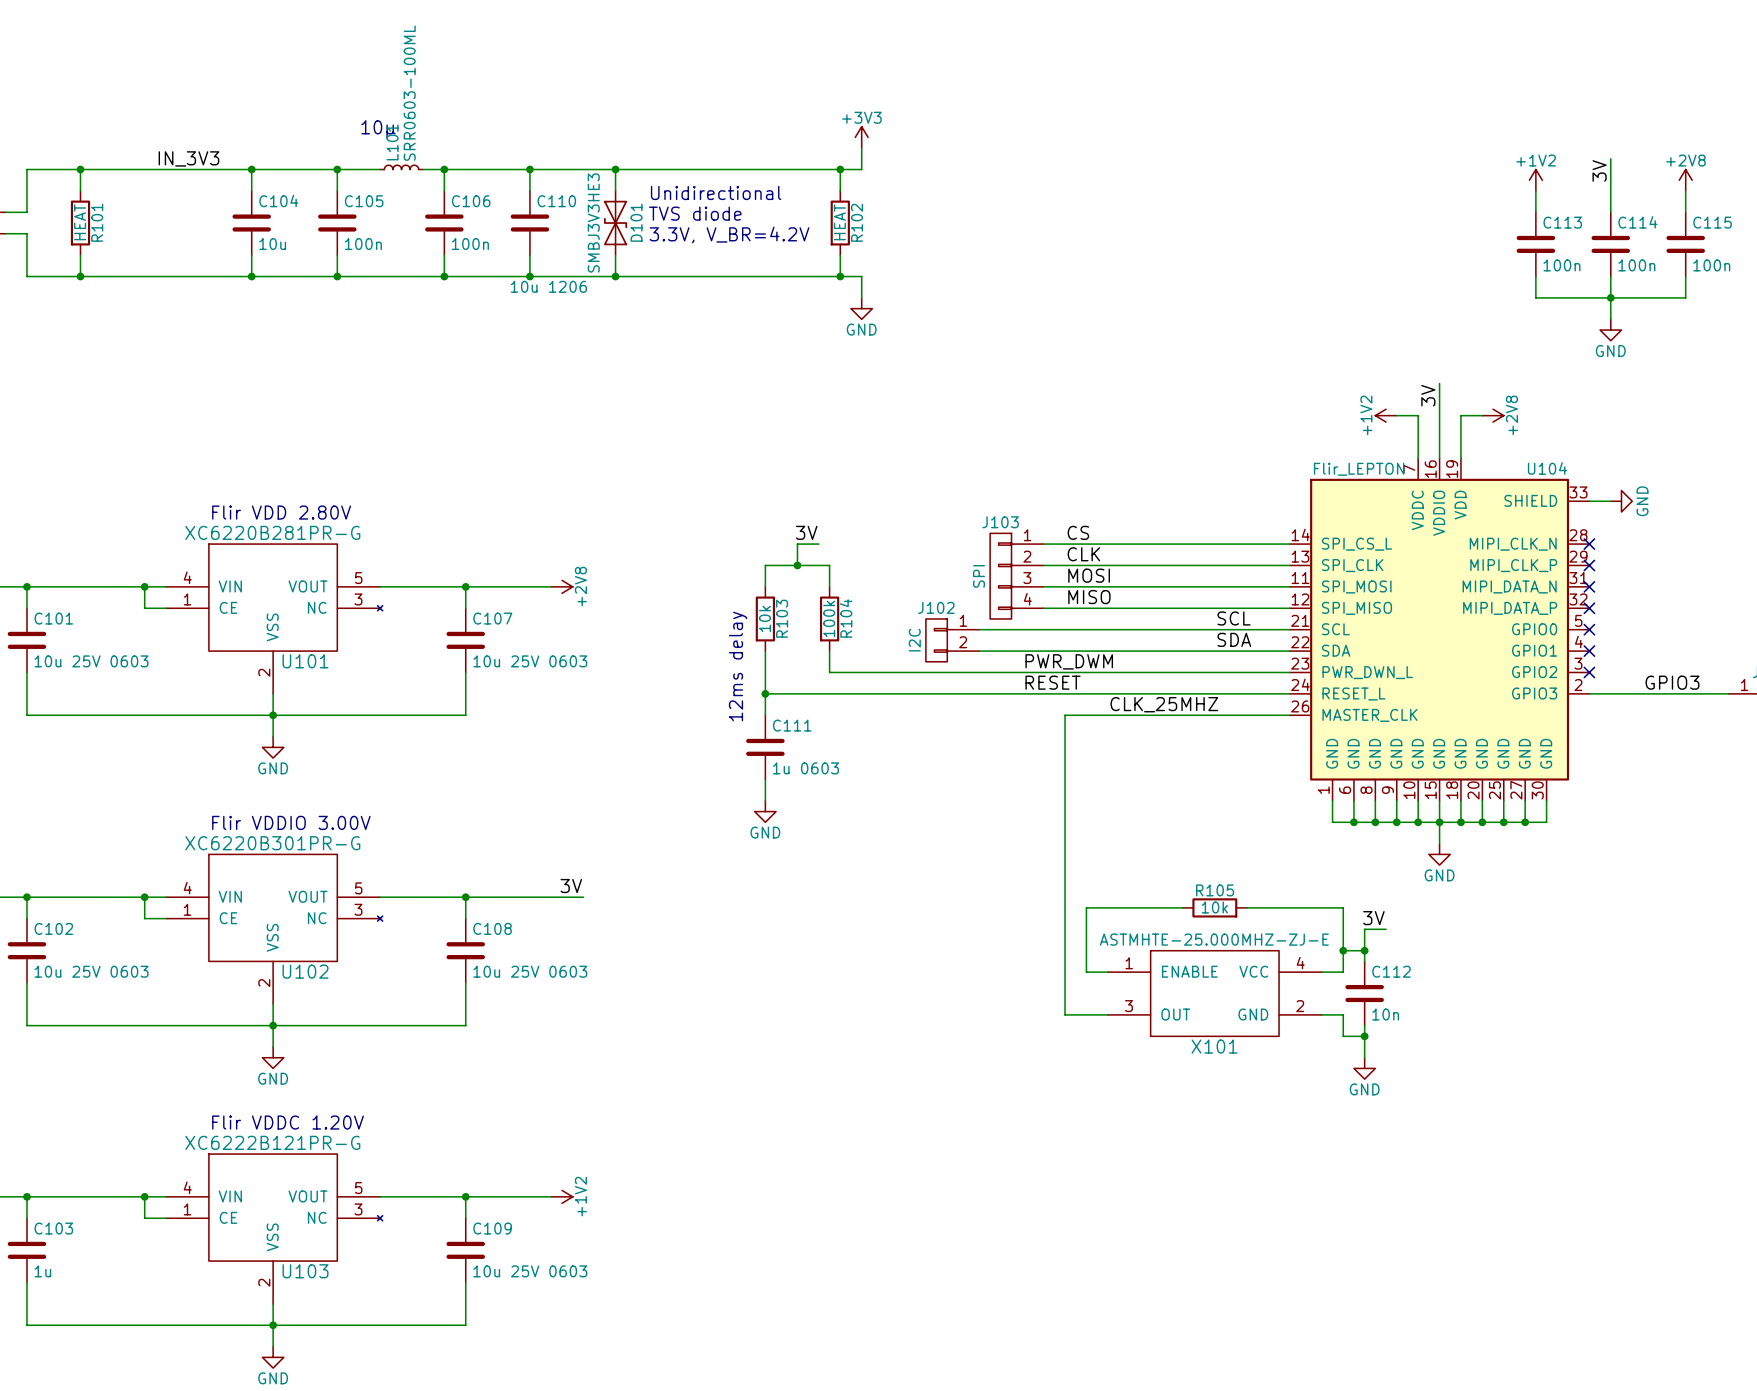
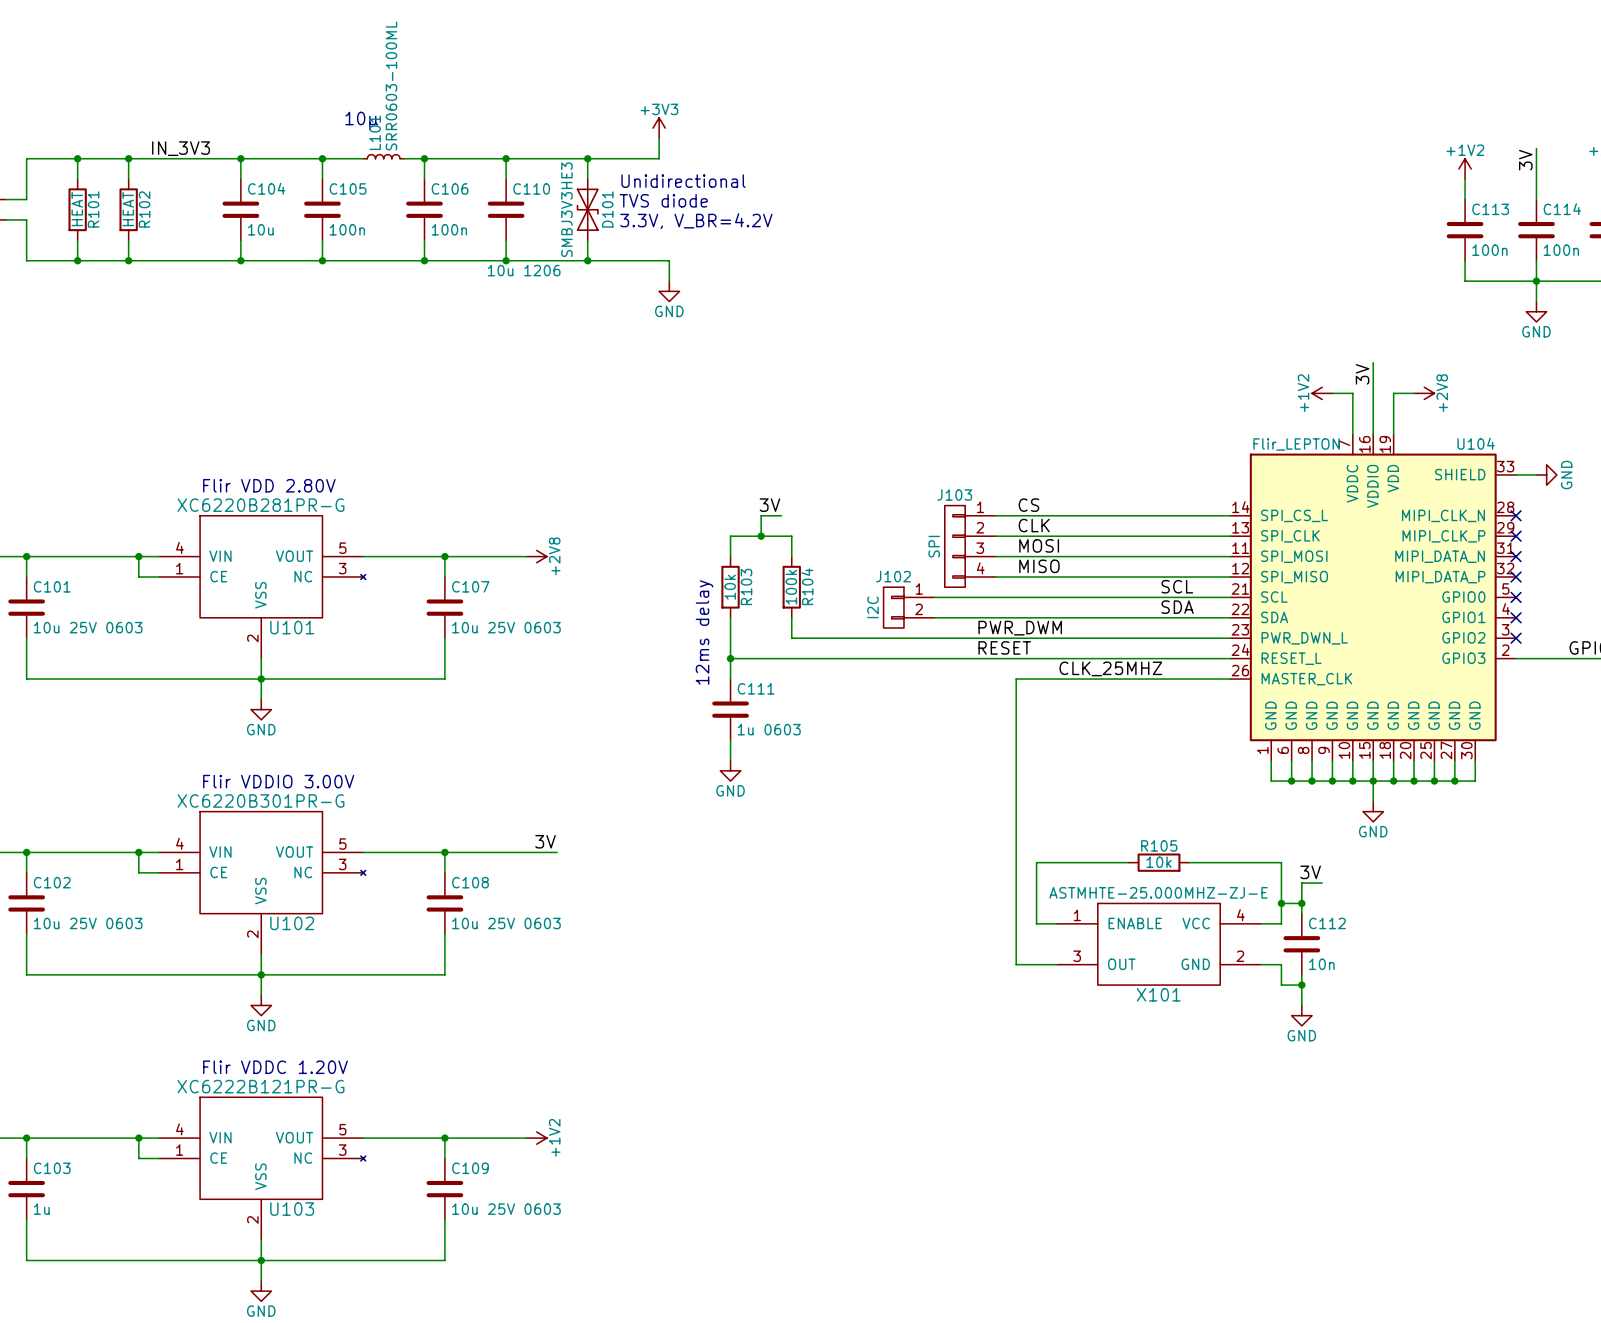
power symbol position: +3V3 (861, 137) -> +3V3 (659, 128)
wire: (861, 148) (861, 169) (690, 169) -> (659, 138) (659, 158)
wire: none -> (128, 158) (128, 179)
junction: none -> (128, 158)
wire: (840, 169) (840, 190) -> none
junction: (840, 169) -> none
R102 position: (840, 223) -> (128, 209)
wire: none -> (128, 240) (128, 260)
wire: (840, 255) (840, 276) -> none
junction: none -> (128, 260)
wire: (701, 276) (861, 276) (861, 297) -> (669, 260) (669, 281)
junction: (840, 276) -> none
power symbol position: GND (861, 308) -> GND (669, 291)

